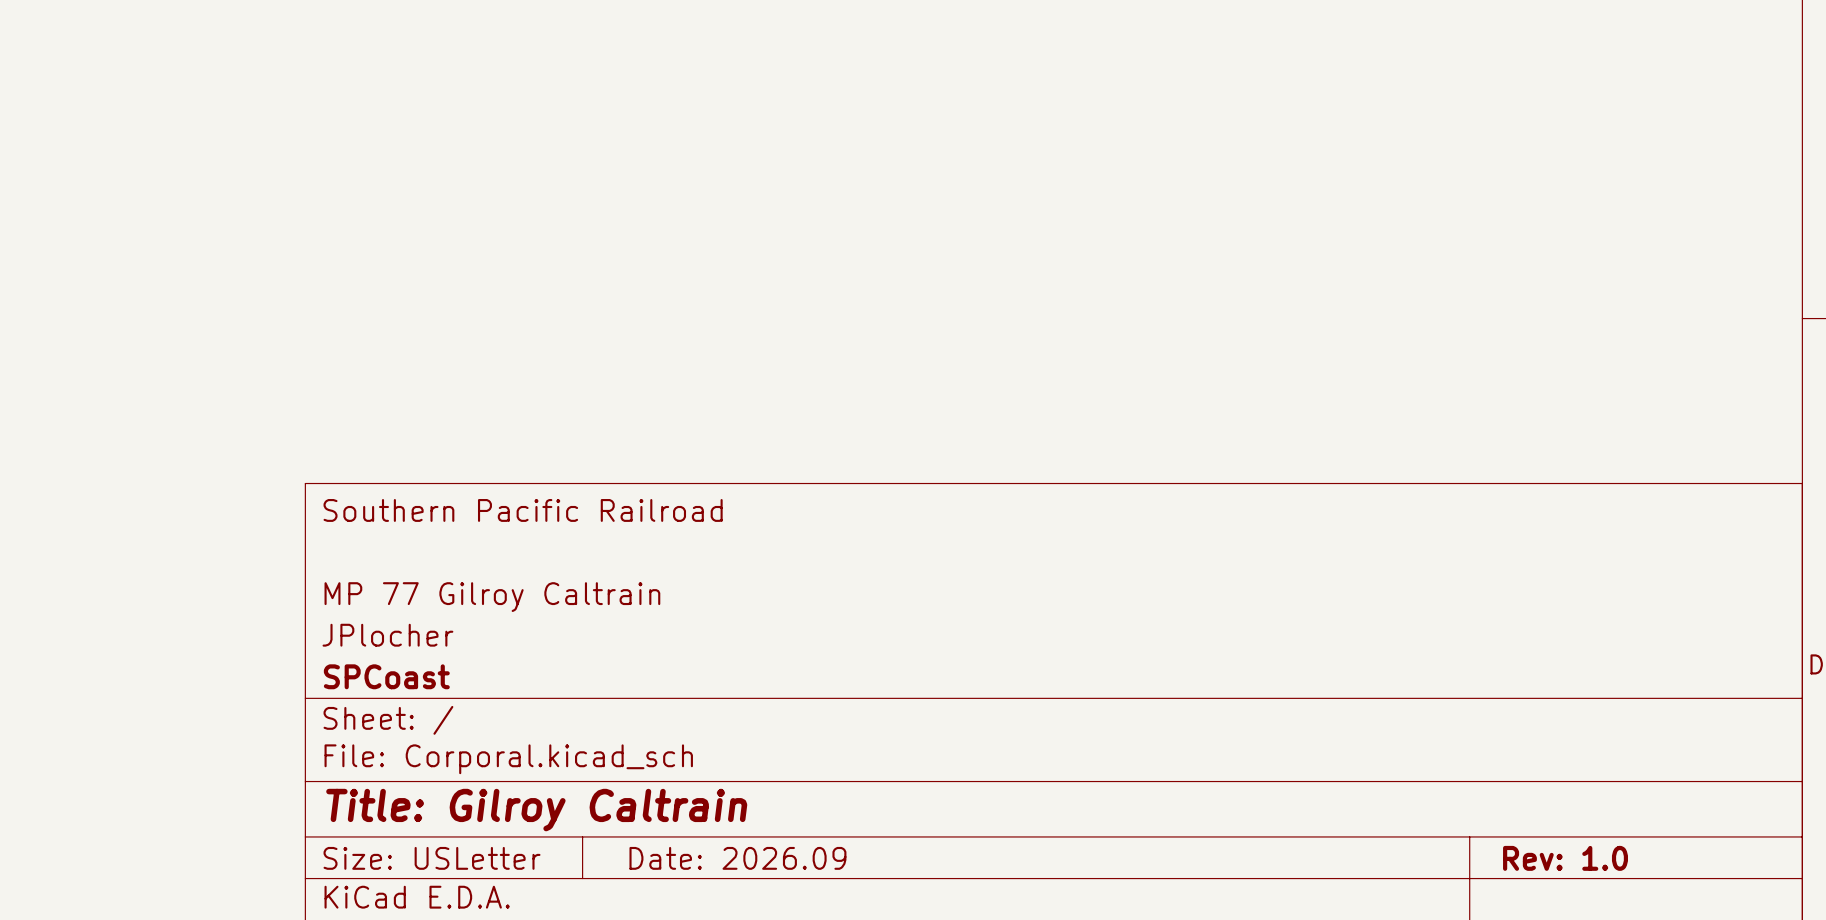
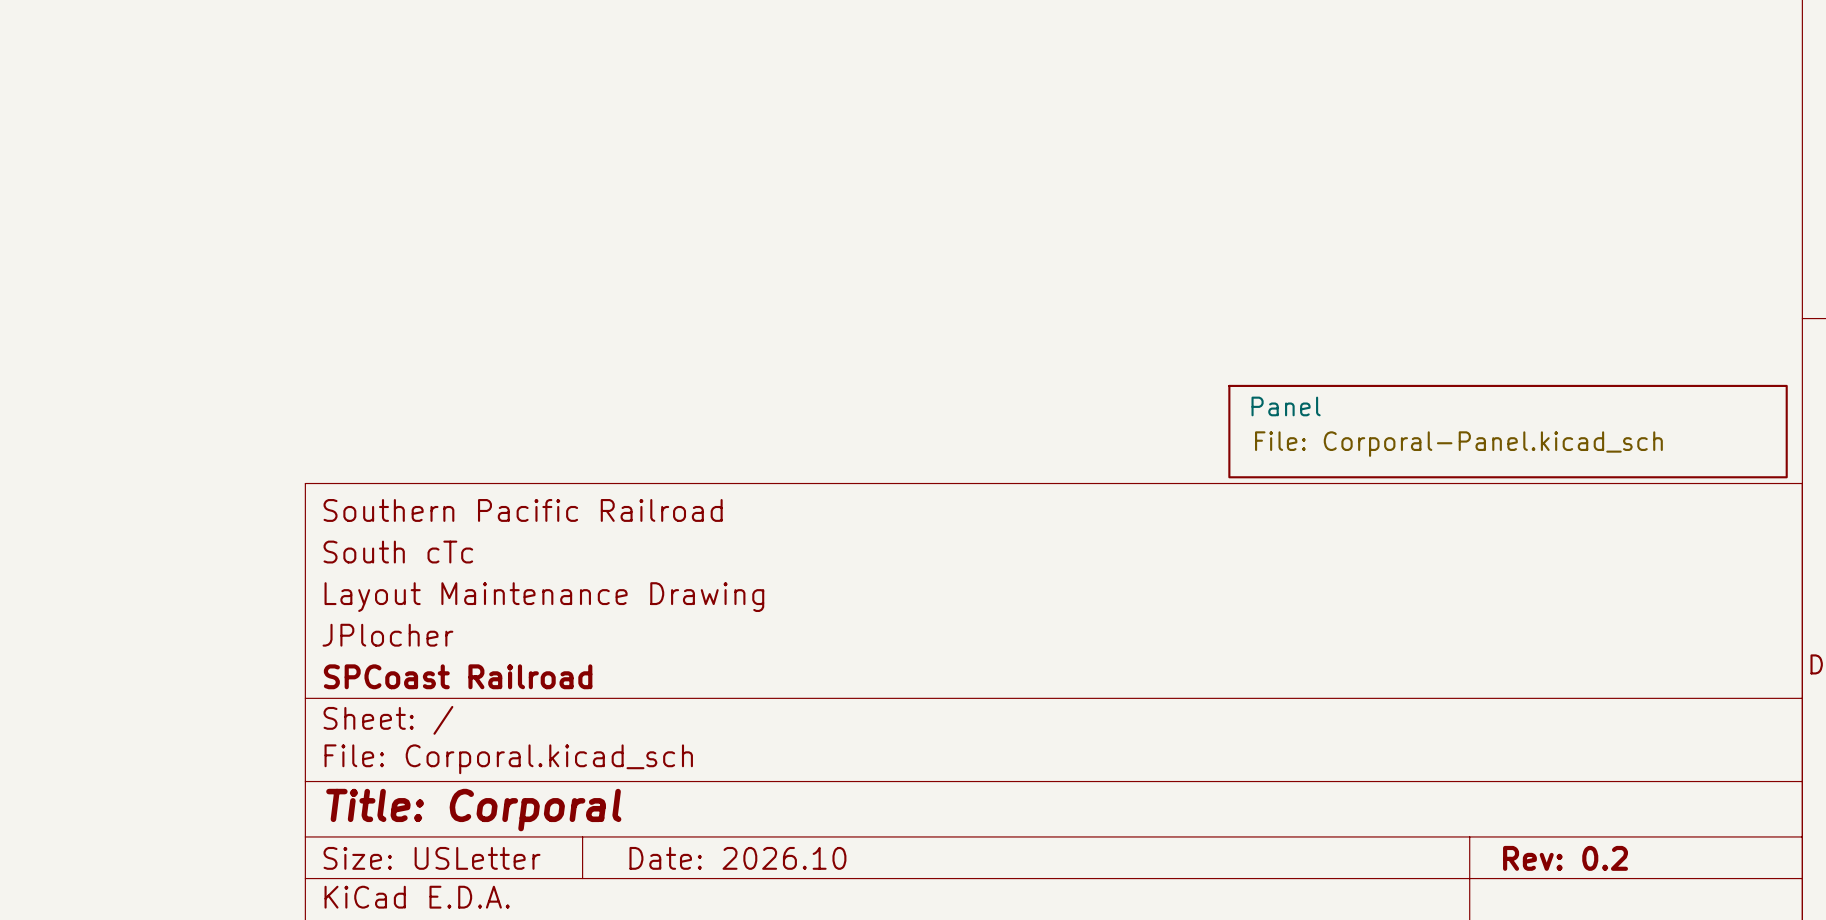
sheet Panel: none -> File: Corporal-Panel.kicad_sch (1508, 431)
title block: none -> South cTc (398, 552)
title block: MP 77 Gilroy Caltrain (492, 597) -> Layout Maintenance Drawing (544, 597)
title block: SPCoast (386, 676) -> SPCoast Railroad (458, 676)
title block: Title: Gilroy Caltrain (536, 810) -> Title: Corporal (473, 810)
title block: Date: 2026.09 (737, 858) -> Date: 2026.10 (737, 858)
title block: Rev: 1.0 (1565, 858) -> Rev: 0.2 (1565, 858)

